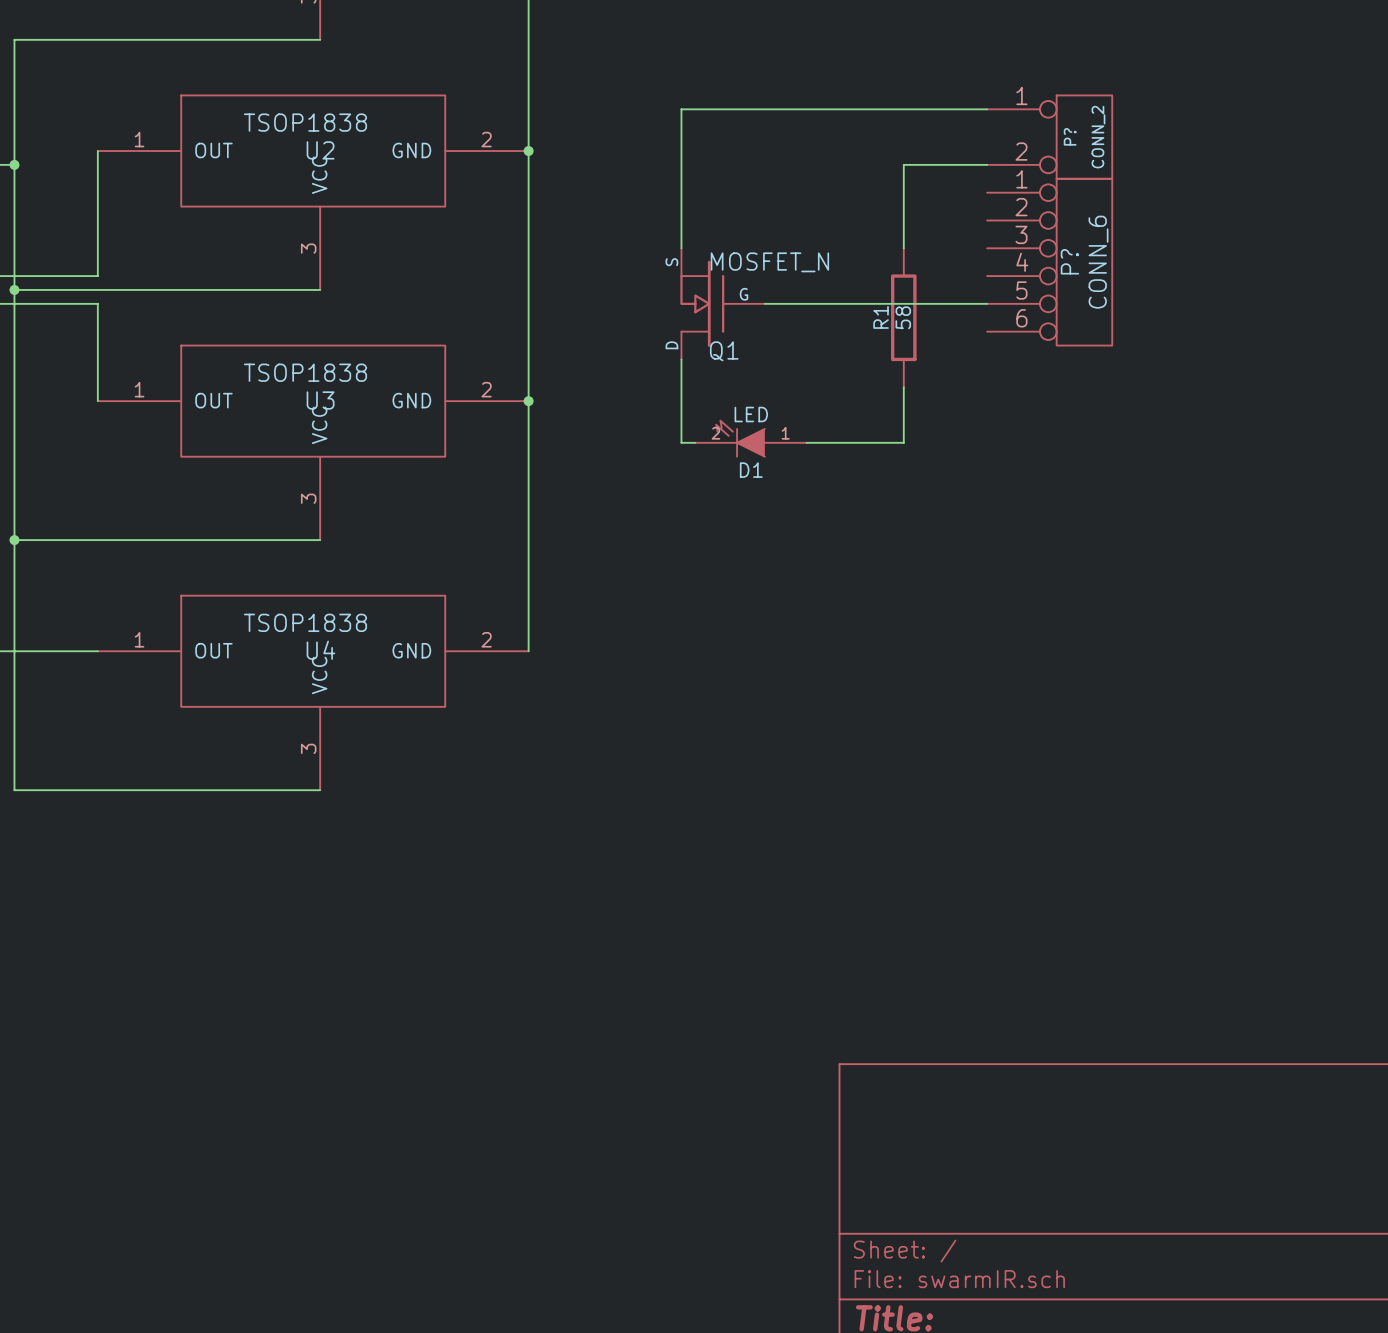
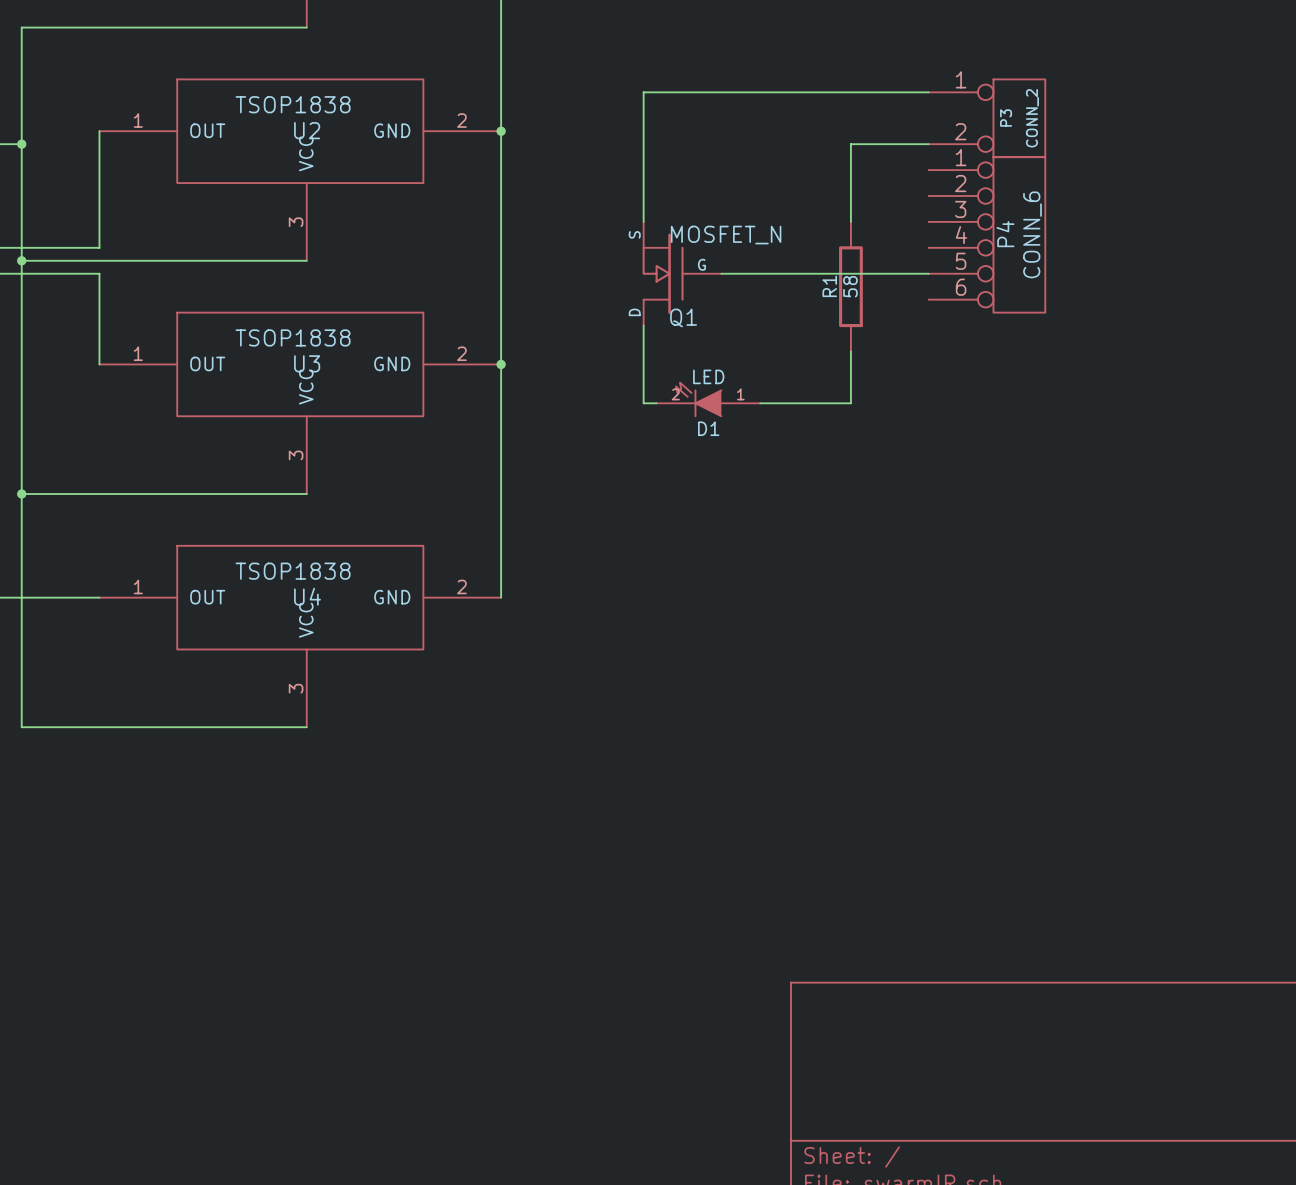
P? name: P? (1070, 136) -> P3 (1006, 118)
P? name: P? (1069, 261) -> P4 (1005, 234)

